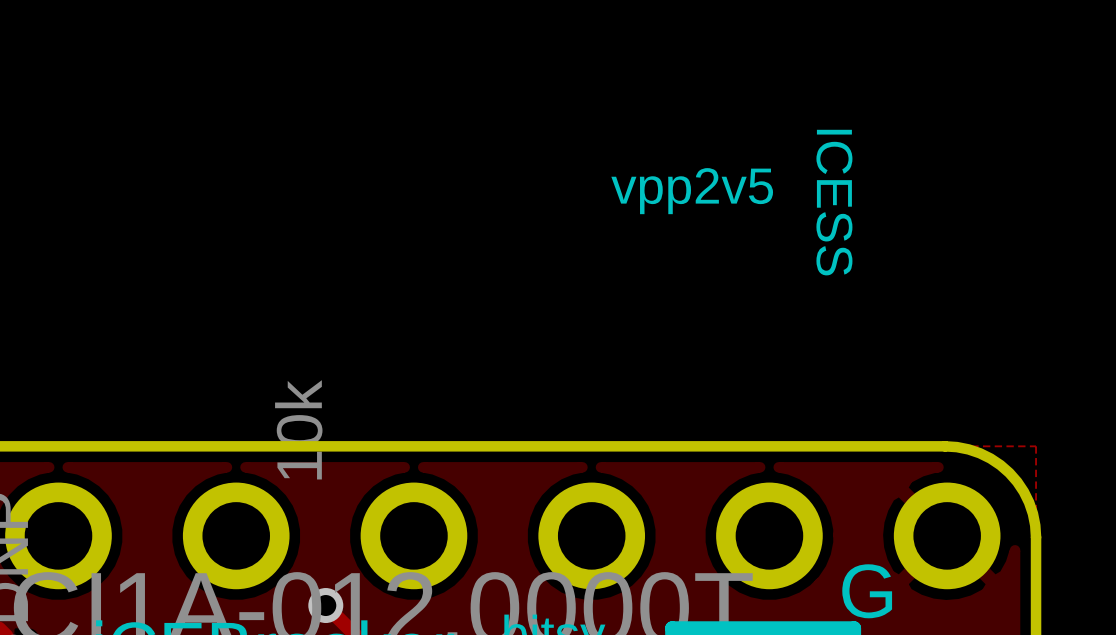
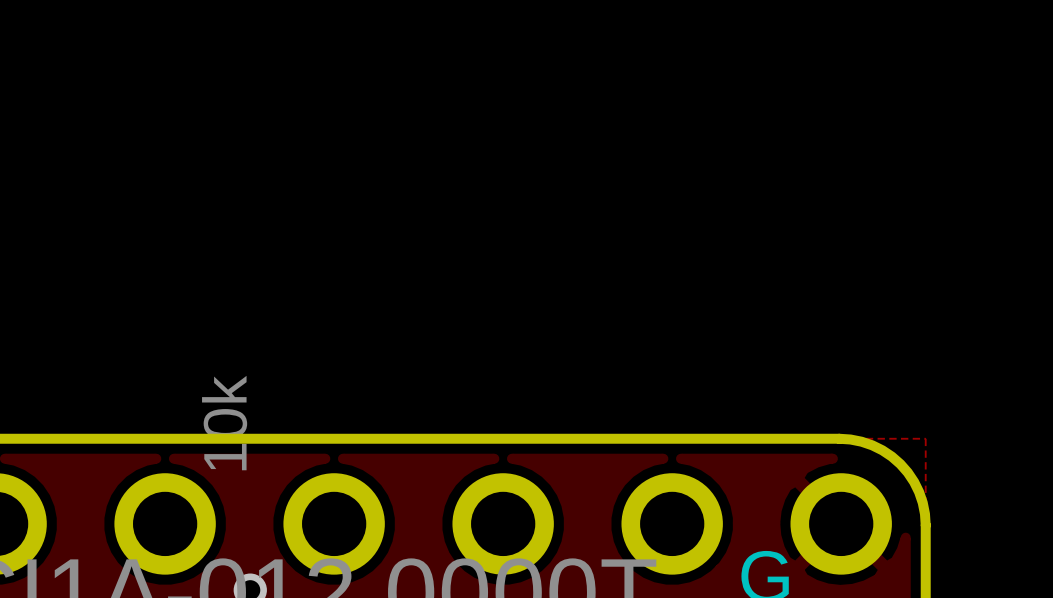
text: vpp2v5 (692, 191) -> none
text: ICESS (834, 202) -> none

